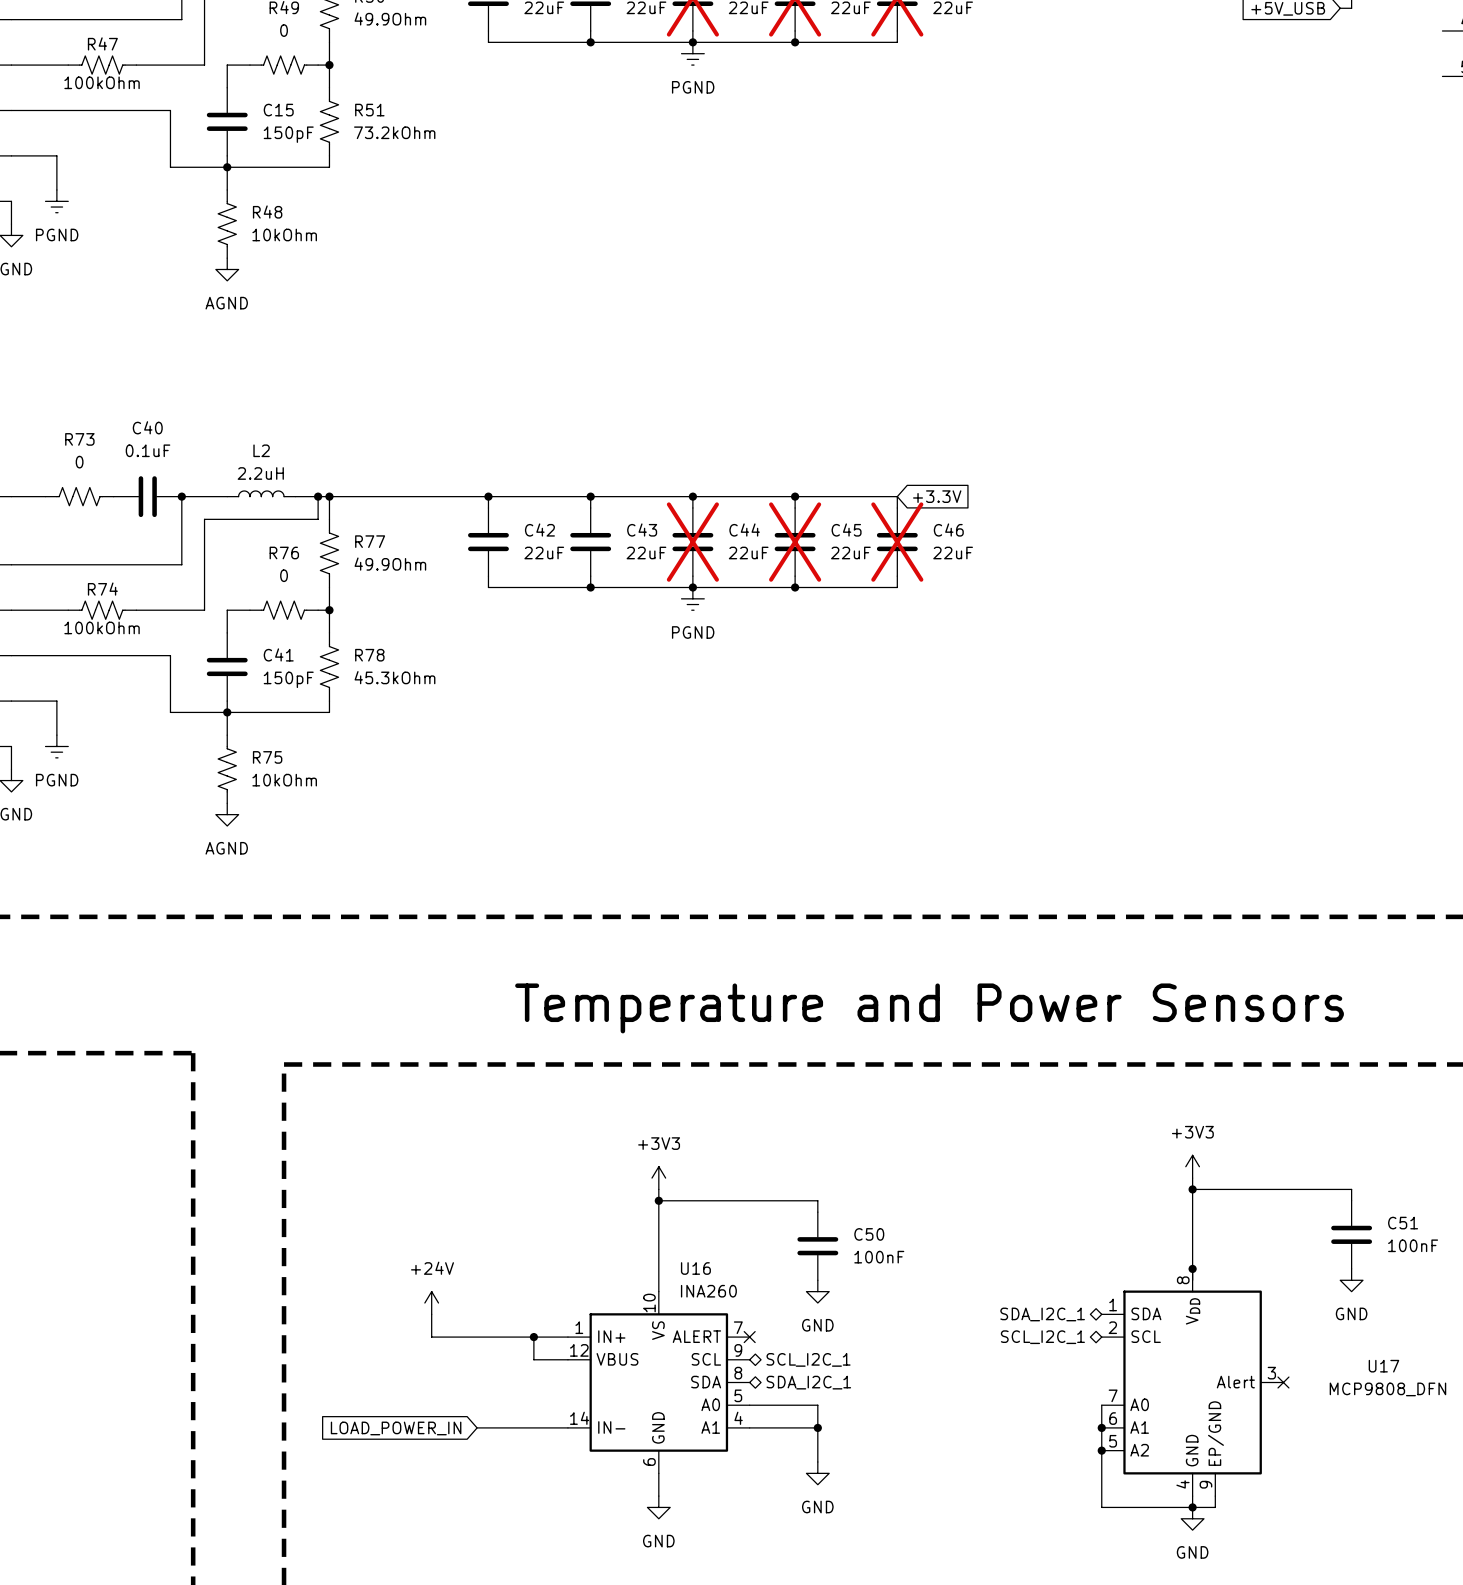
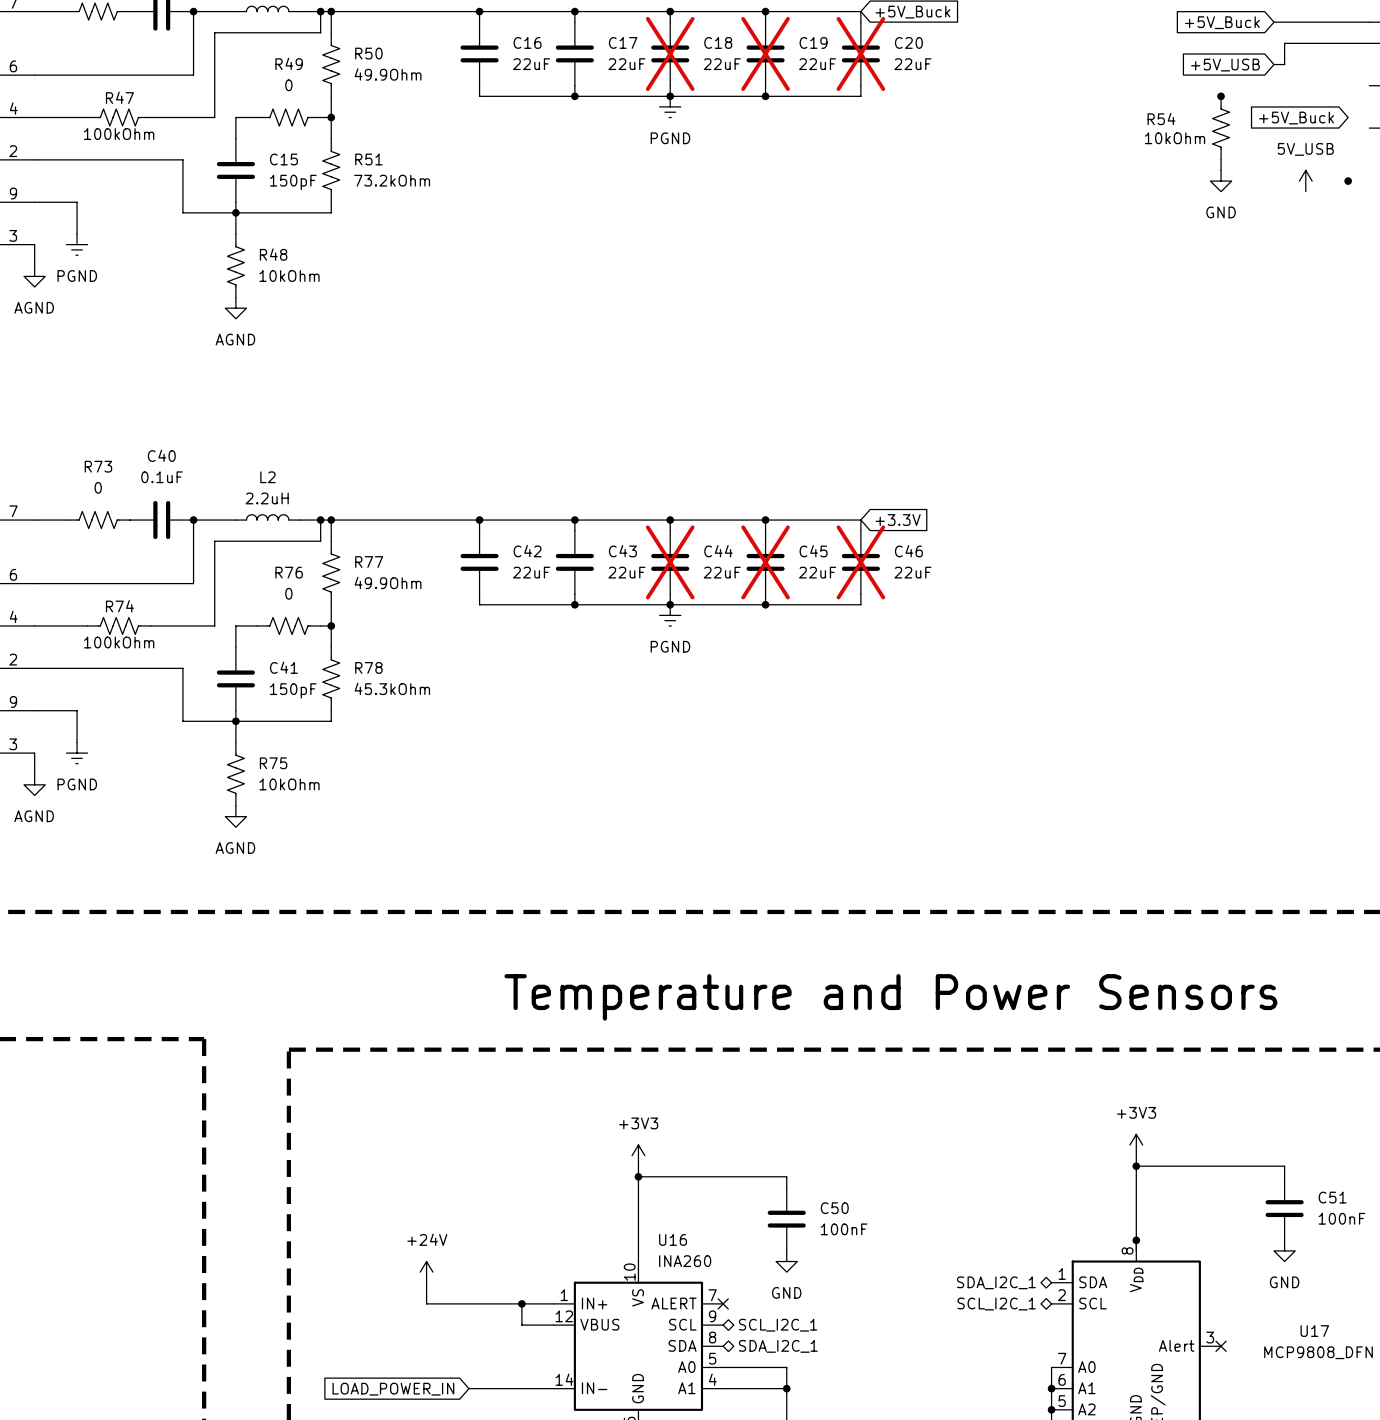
junction: none -> (1221, 96)
global label: none -> +5V_Buck (1296, 118)
R54: none -> 10kOhm (1221, 128)
wire: none -> (1221, 159) (1221, 170)
power symbol: none -> GND (1221, 181)
power symbol: none -> 5V_USB (1305, 181)
junction: none -> (1348, 181)

